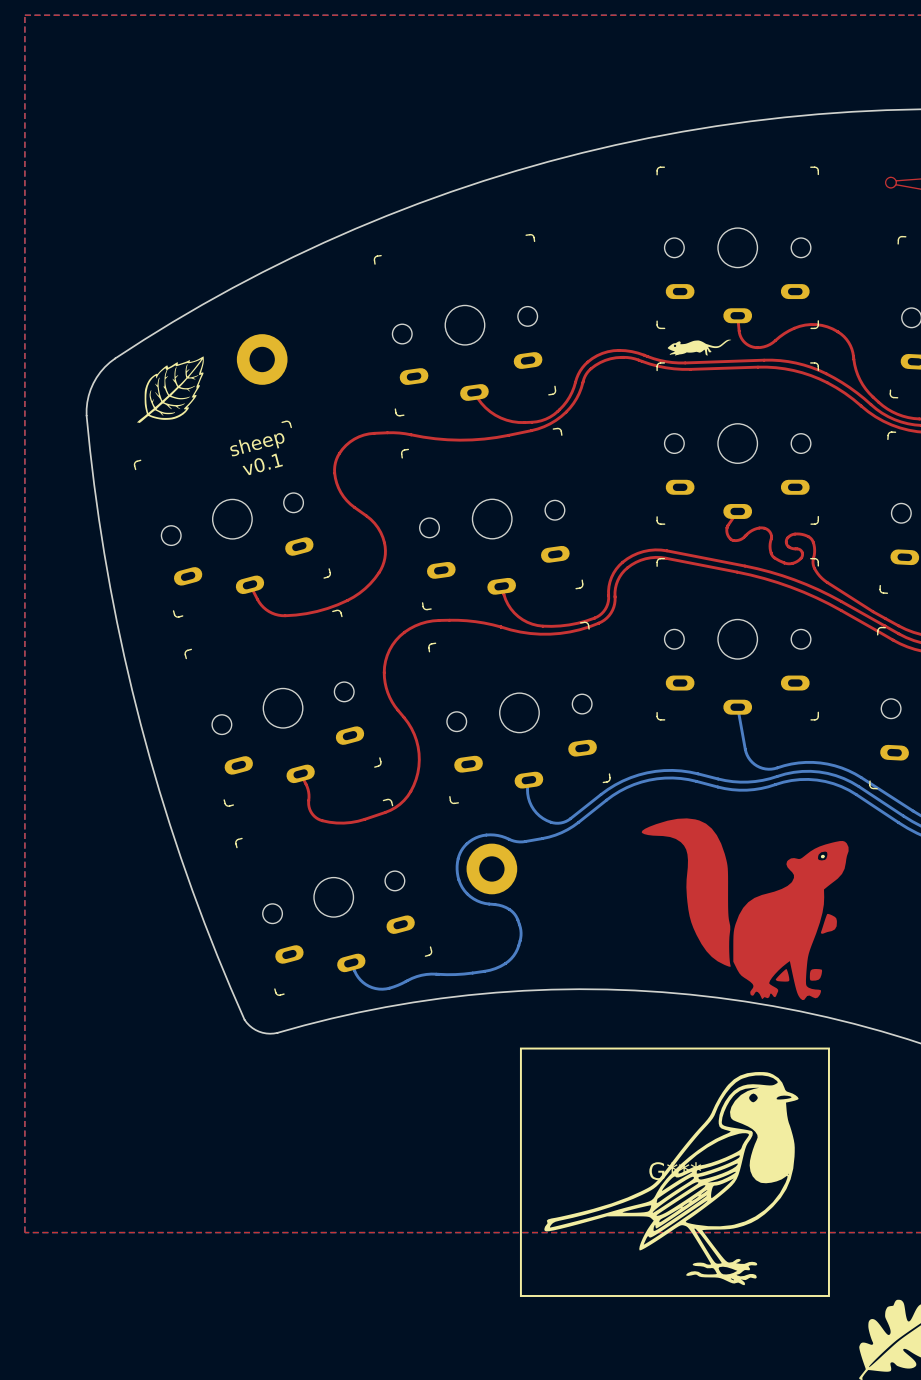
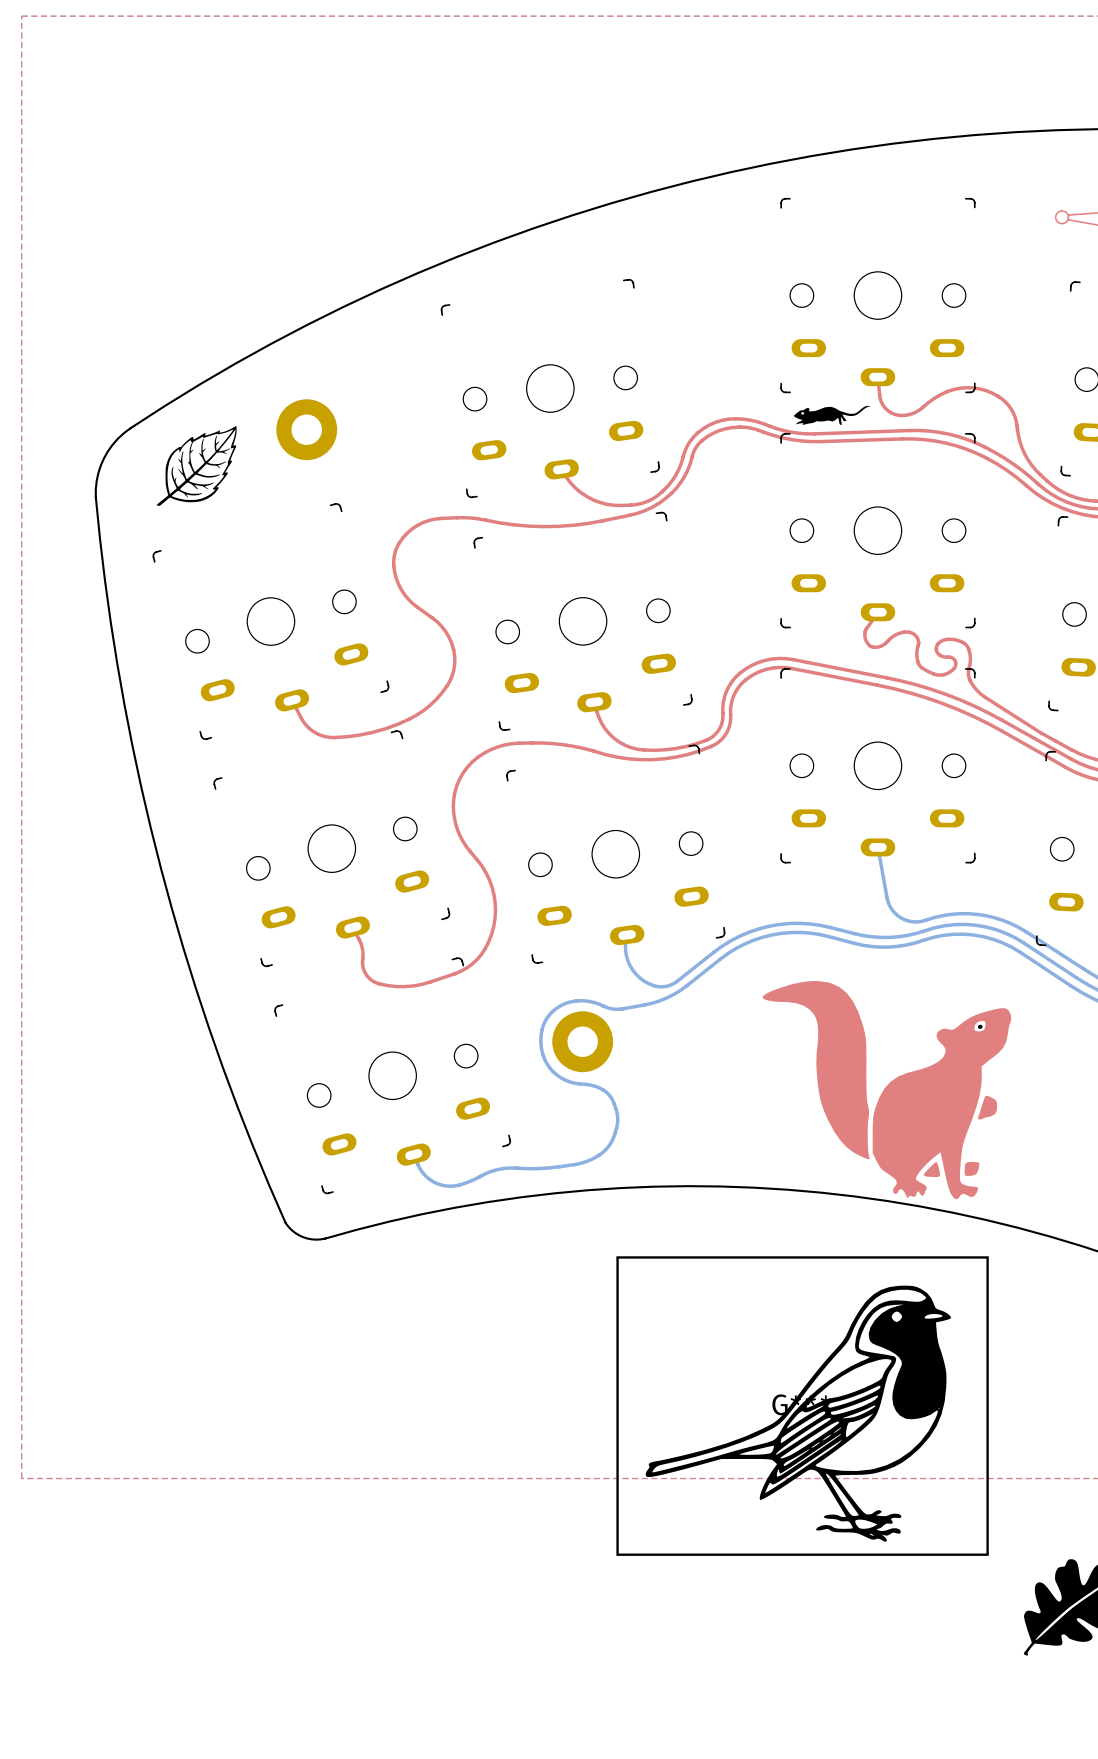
text: sheep (257, 444) -> none
text: v0.1 (262, 464) -> none

